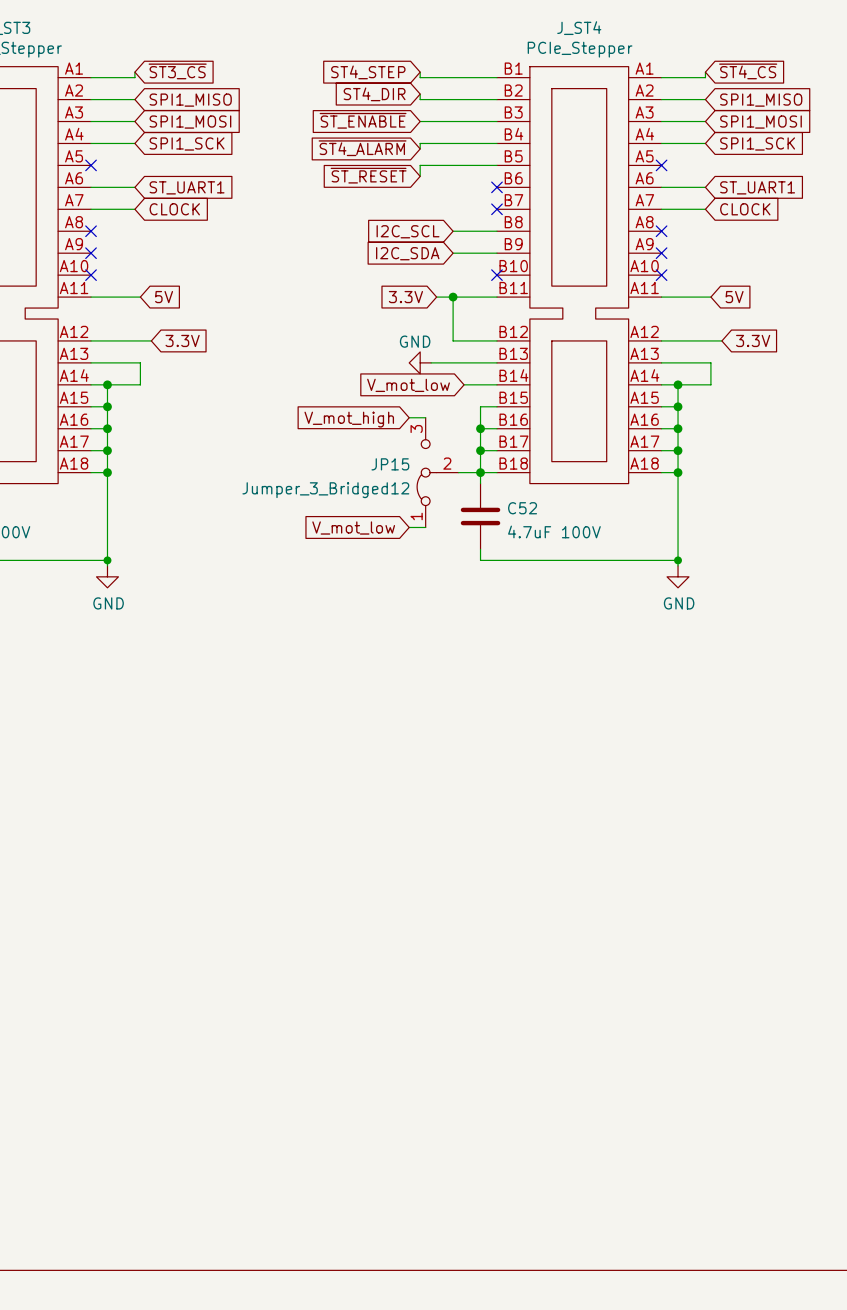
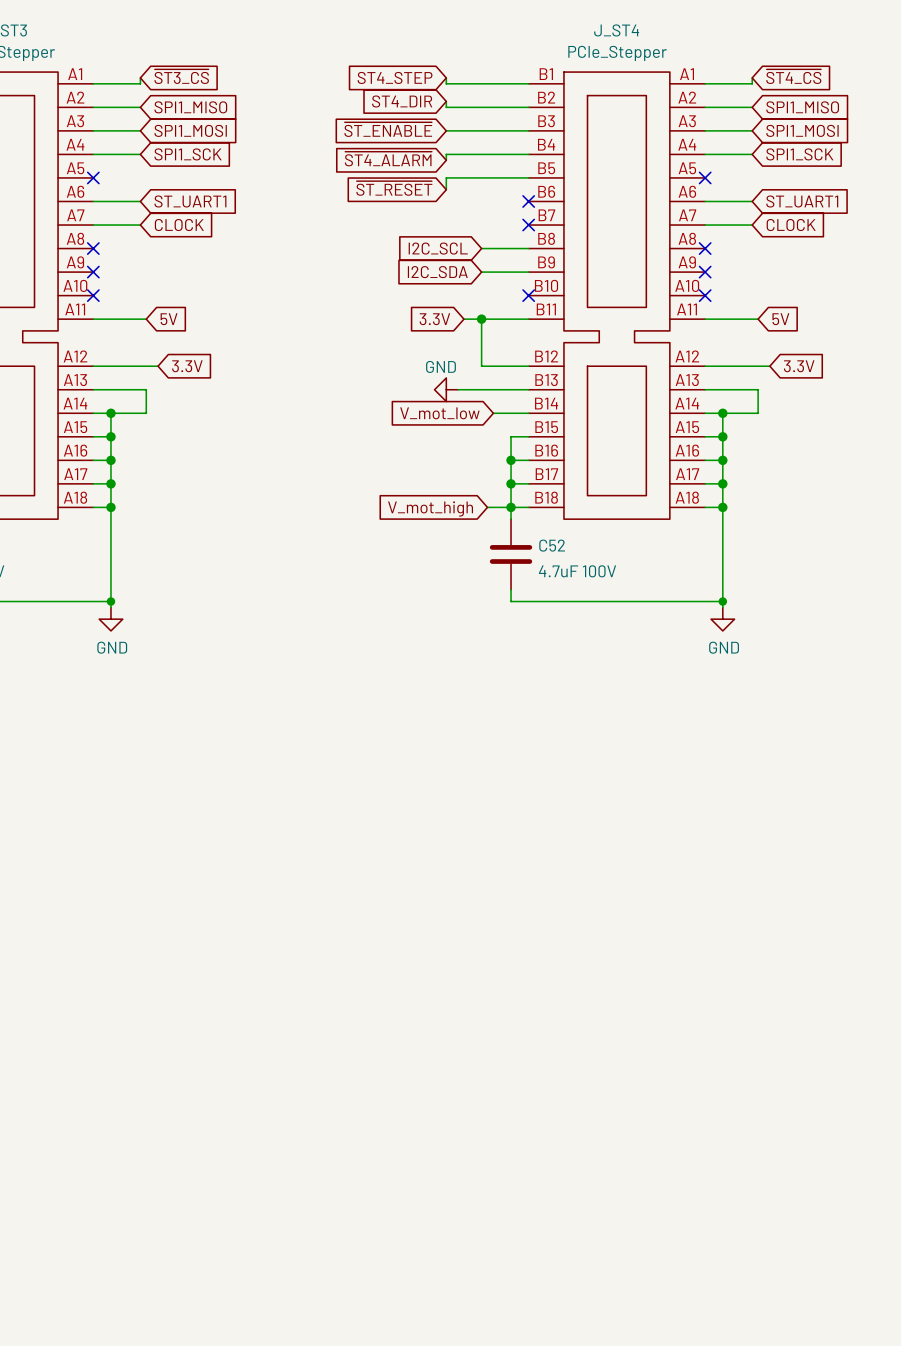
wire: (409, 417) (425, 417) -> none
global label position: V_mot_high (349, 419) -> V_mot_high (430, 508)
JP15: Jumper_3_Bridged12 (437, 472) -> none
wire: (409, 527) (425, 527) -> none
global label: V_mot_low (353, 528) -> none

